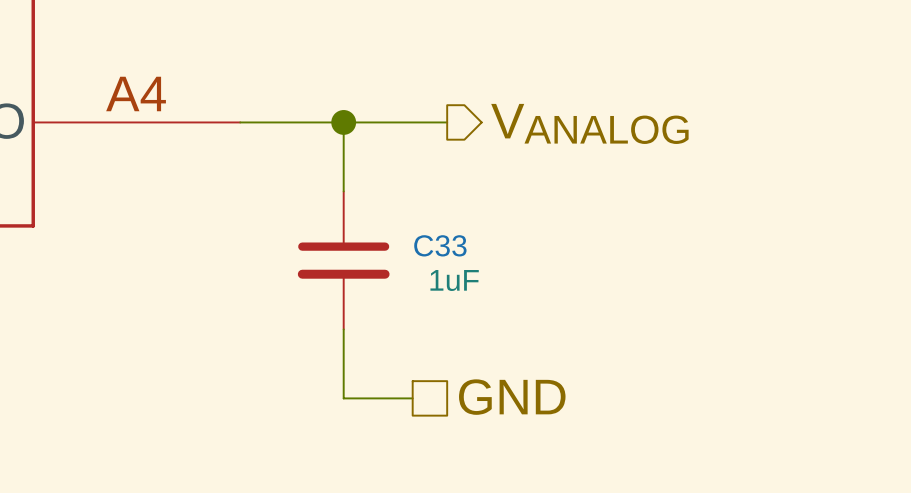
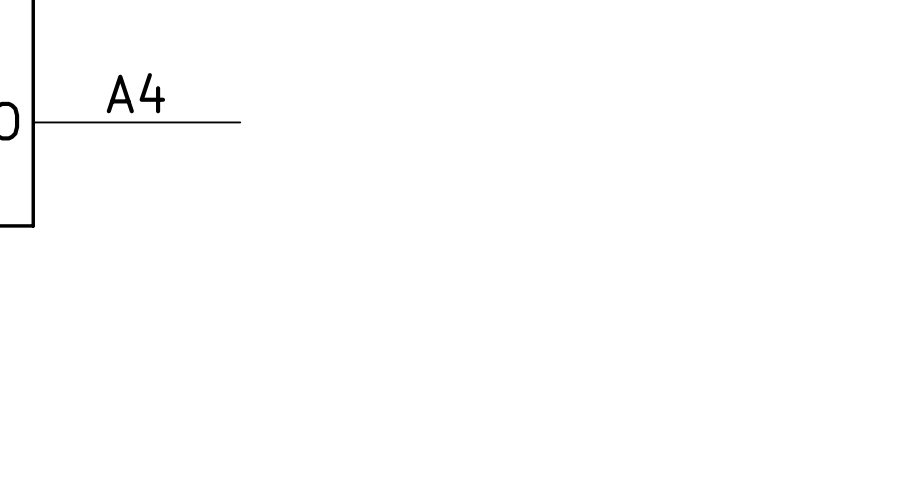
wire: (240, 122) (447, 122) -> none
wire: (343, 122) (343, 191) -> none
junction: (343, 122) -> none
hierarchical label: VANALOG (589, 123) -> none
C33: 1uF (343, 260) -> none
wire: (343, 329) (343, 398) (412, 398) -> none
hierarchical label: GND (512, 397) -> none

